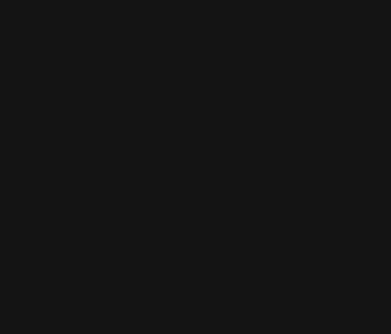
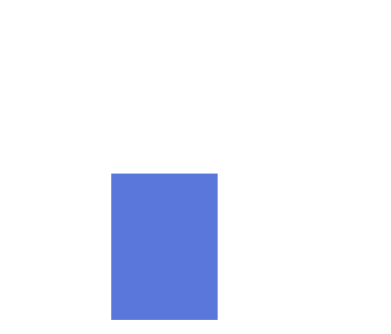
part: none -> (164, 246)

